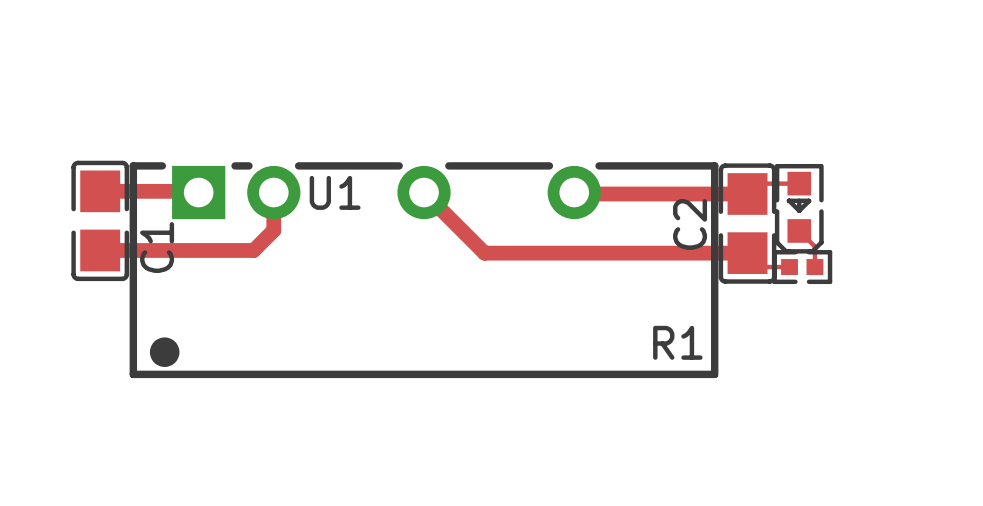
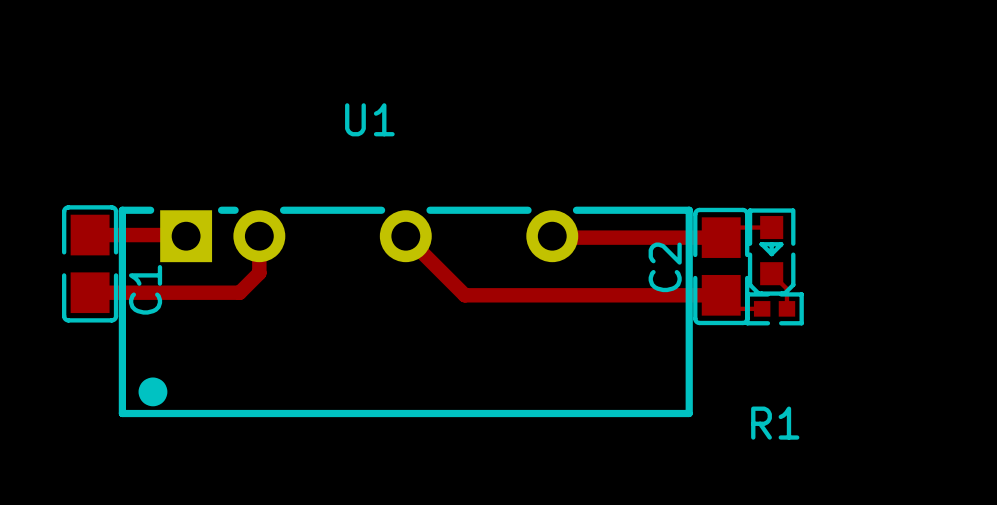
U1 name position: U1 (335, 192) -> U1 (369, 119)
R1 name position: R1 (677, 342) -> R1 (775, 423)

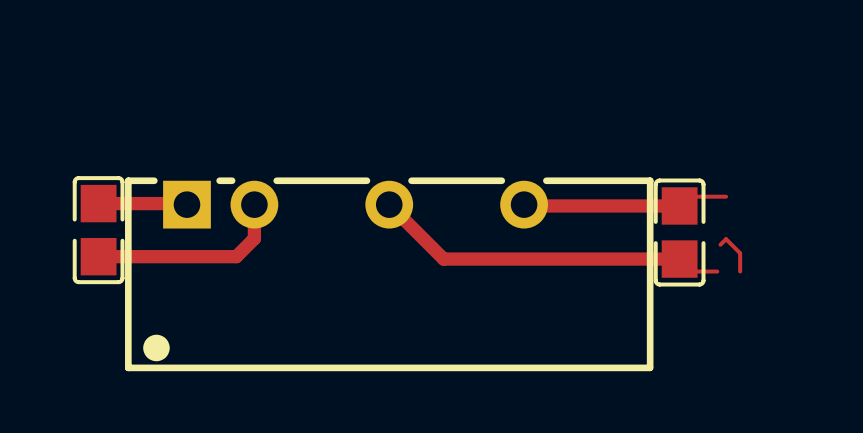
U1 name: U1 (369, 119) -> none
part: (771, 252) -> none
C1: (90, 263) -> none
C2: (721, 266) -> none
part: none -> (679, 232)
R1: (774, 308) -> none

